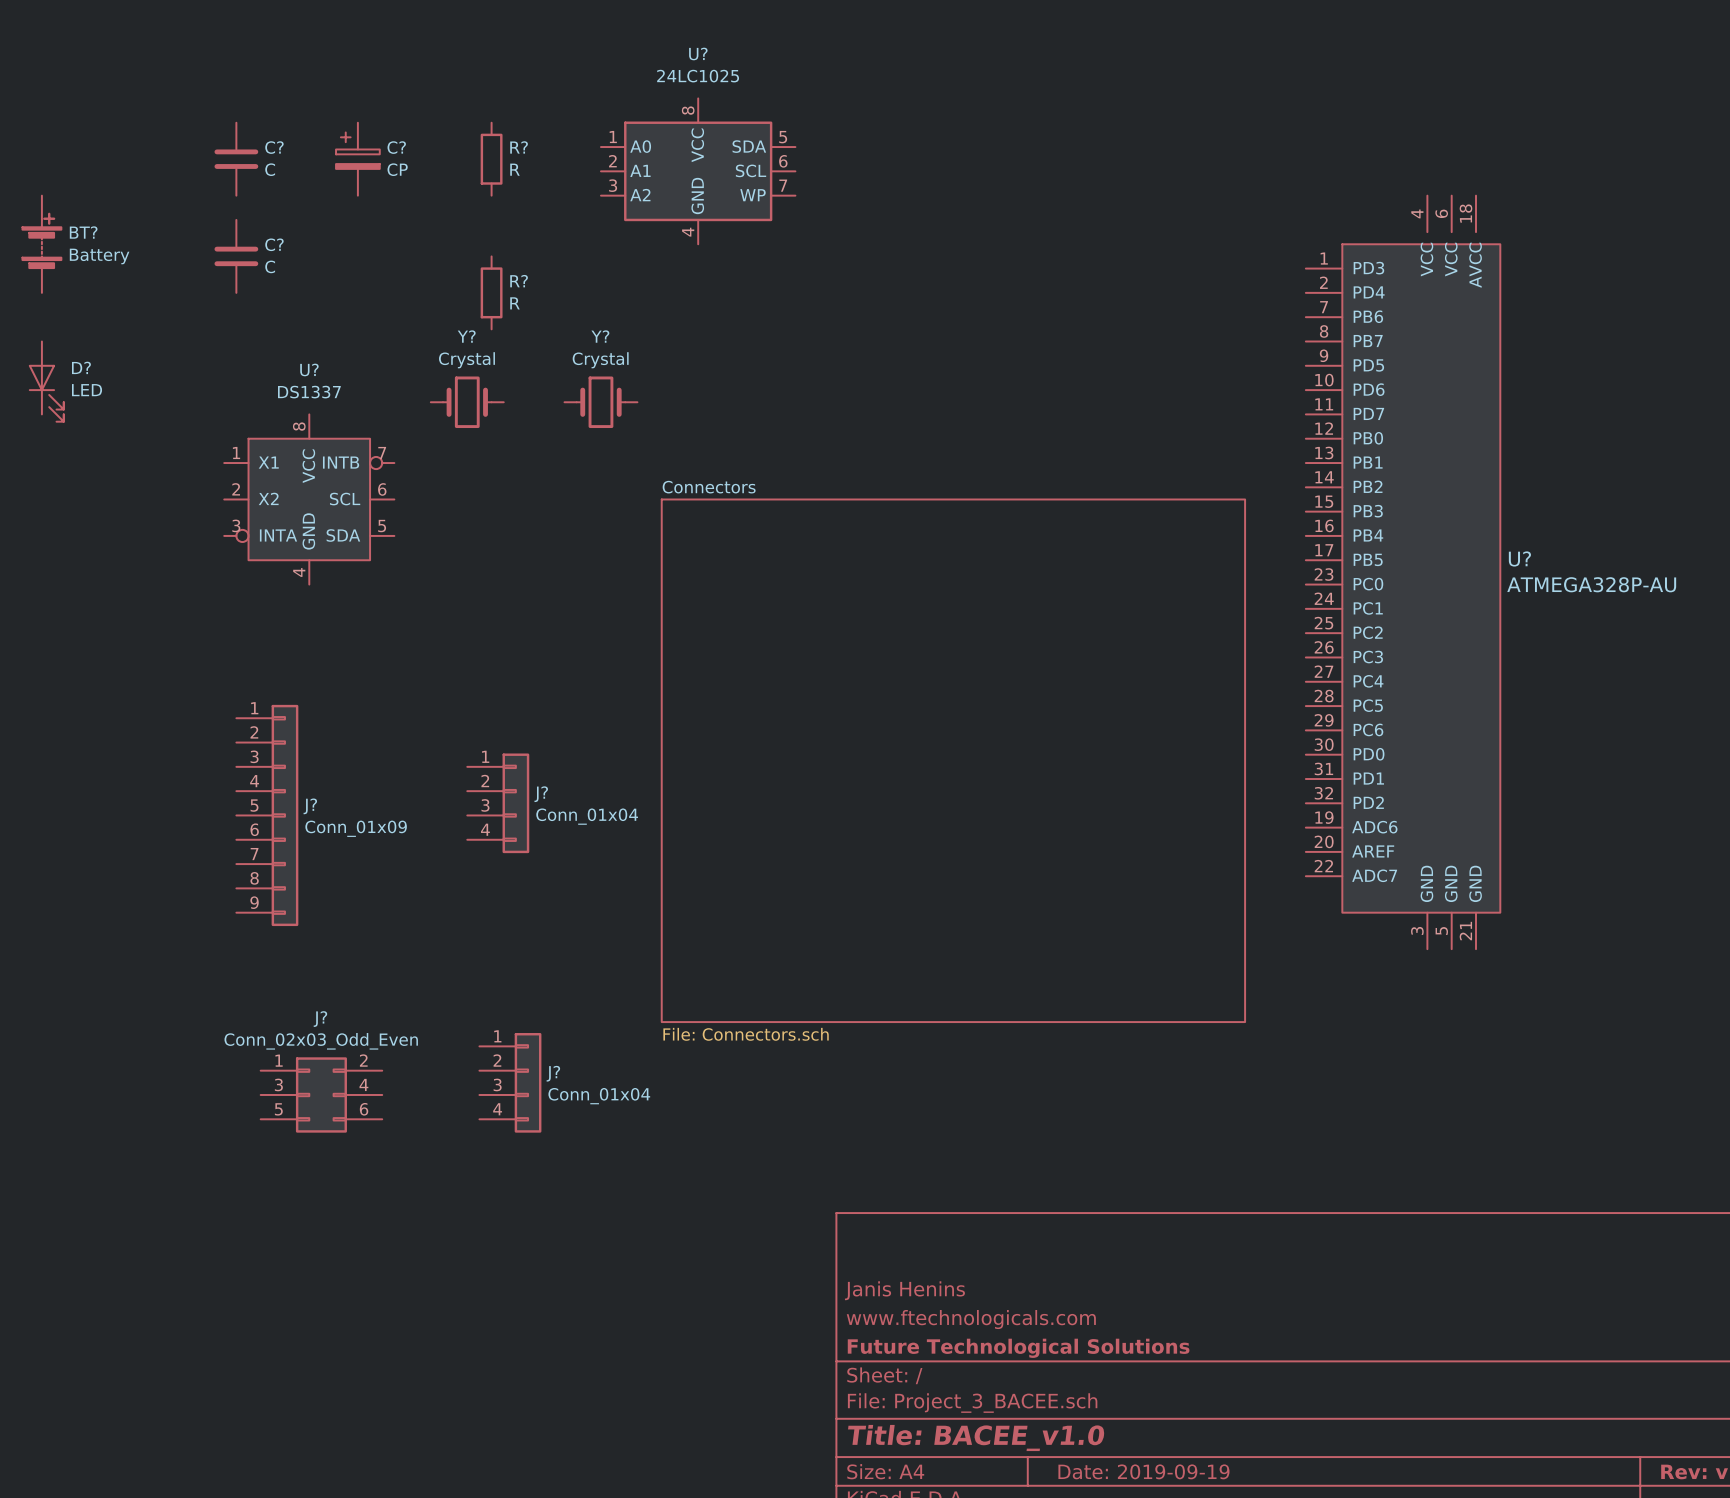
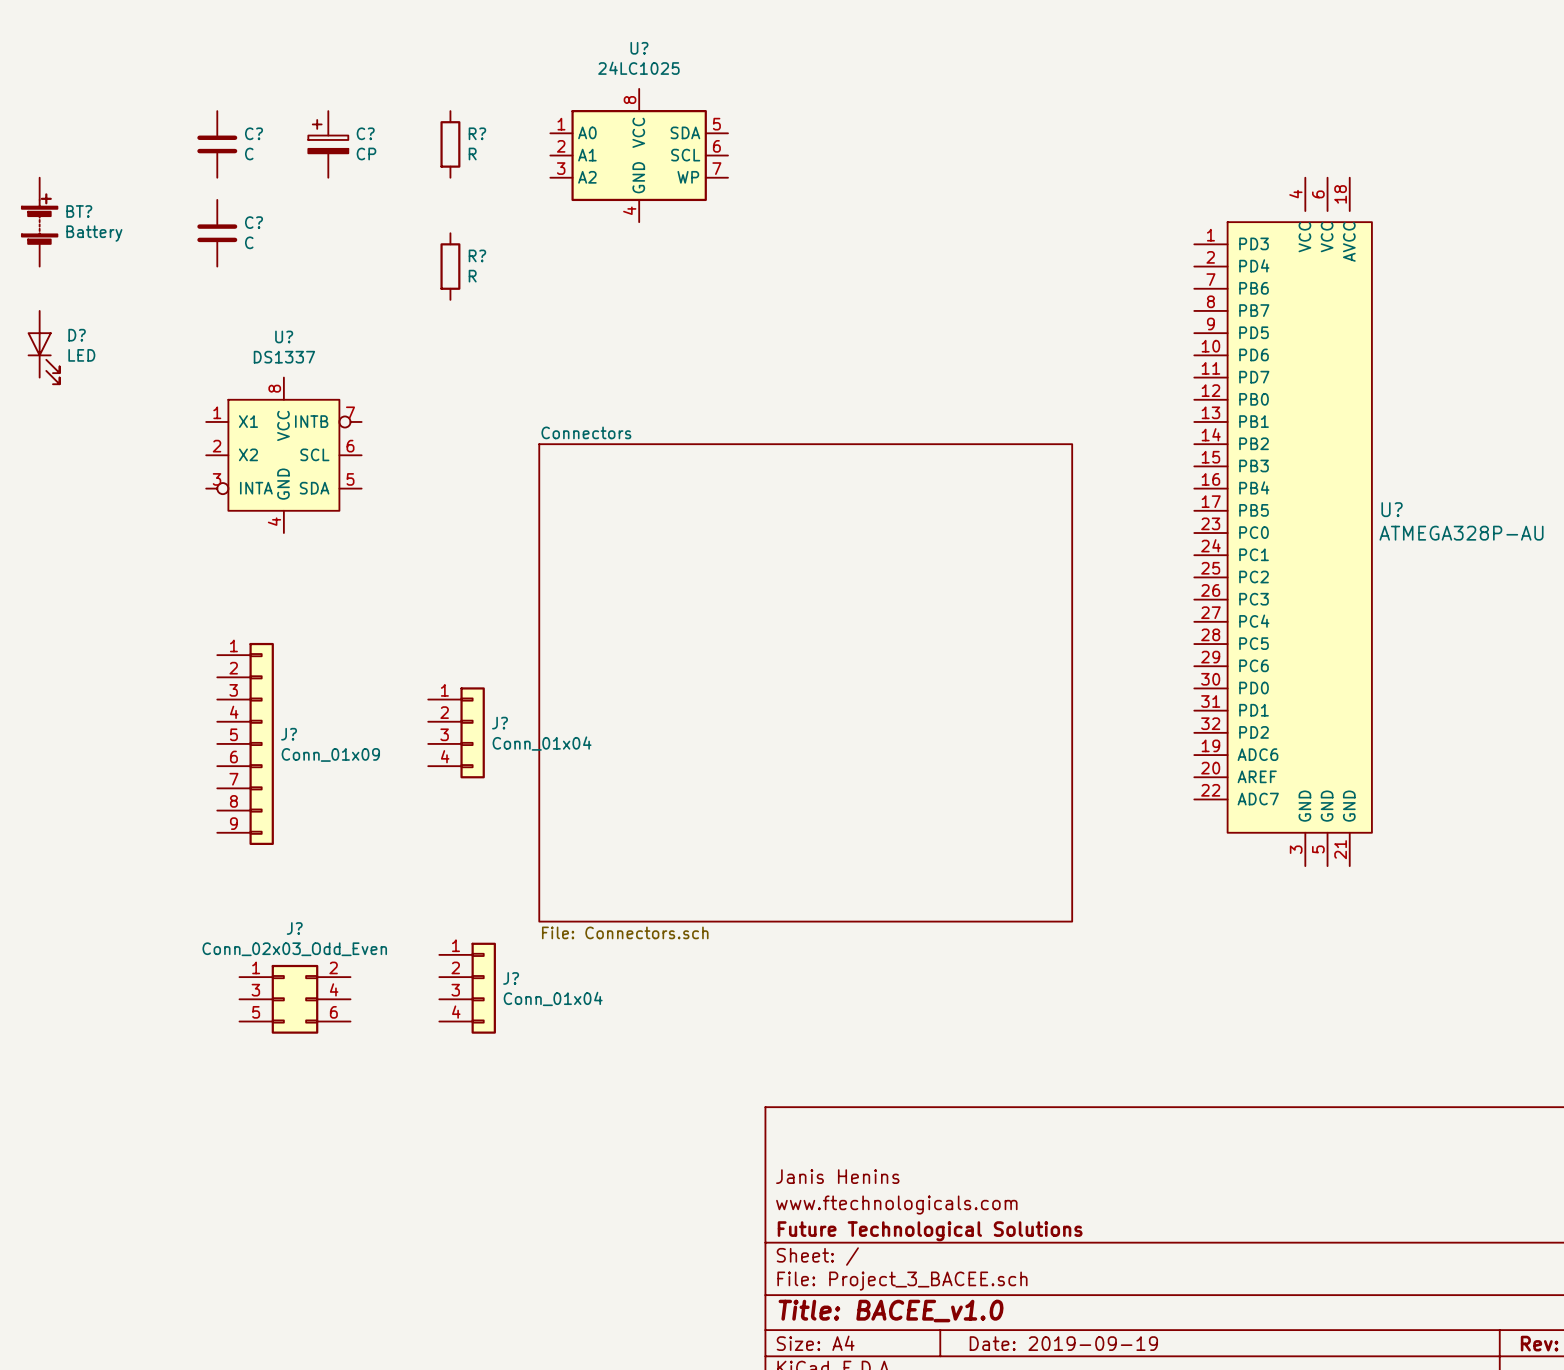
Y?: Crystal (467, 402) -> none
Y?: Crystal (600, 402) -> none
sheet Connectors position: (953, 760) -> (805, 682)

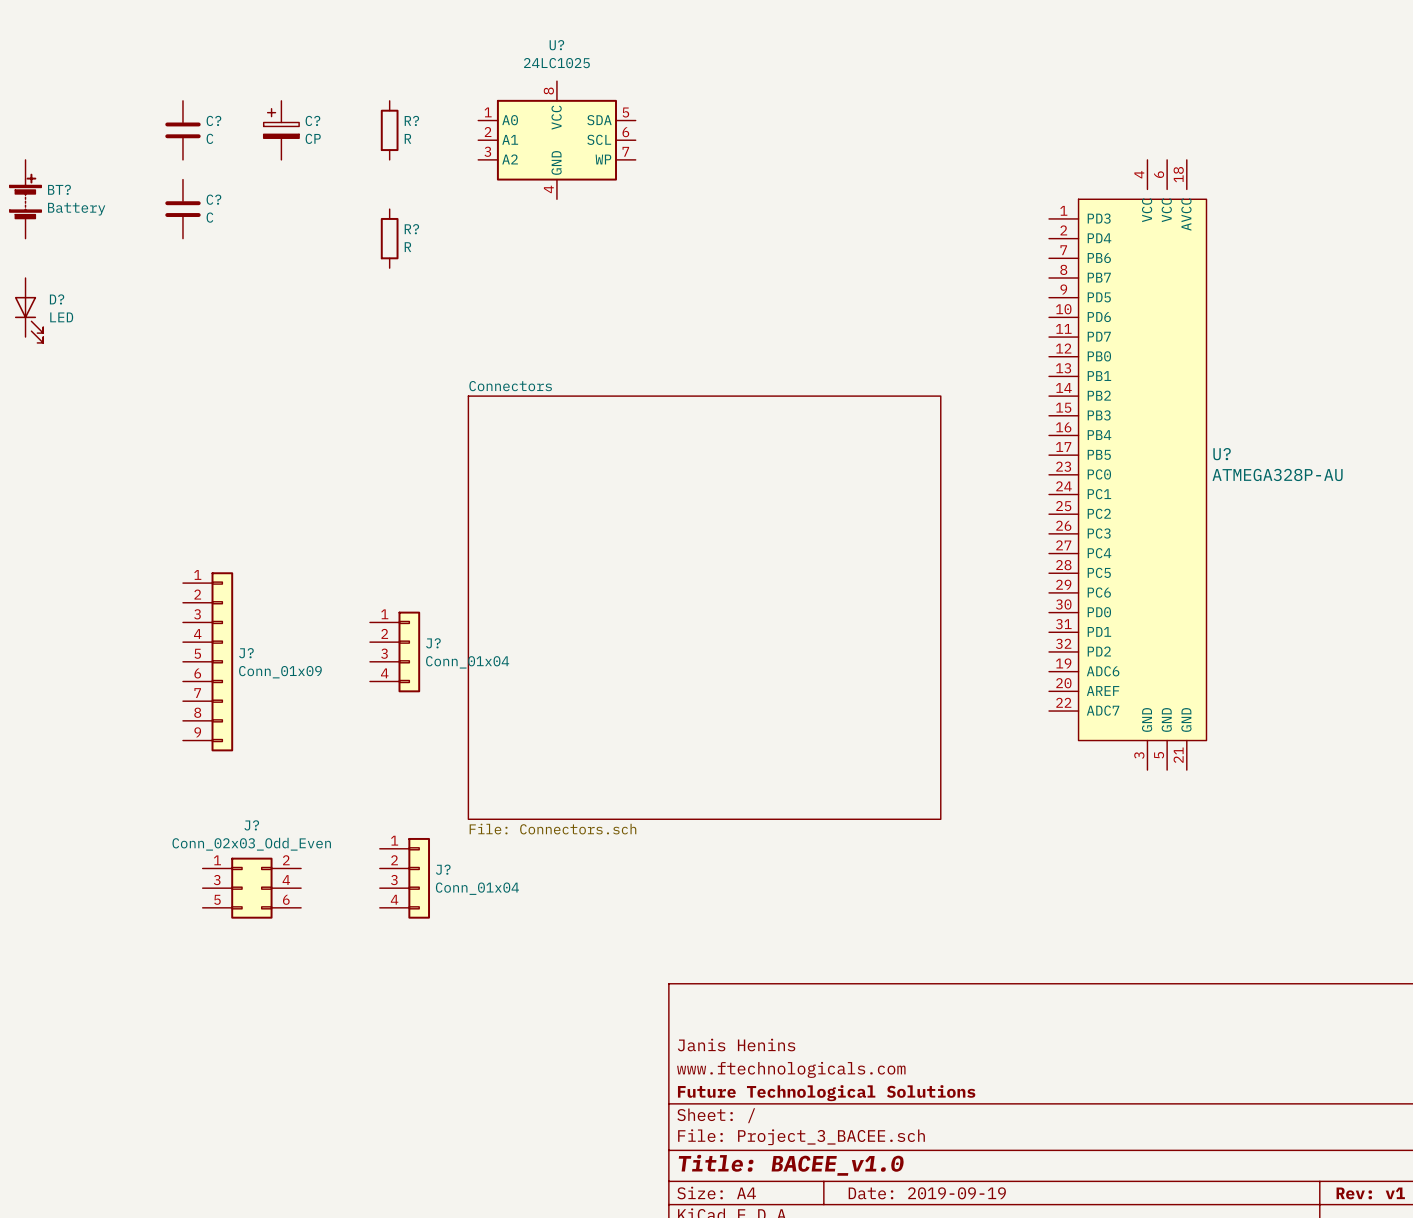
U?: DS1337 (283, 455) -> none

